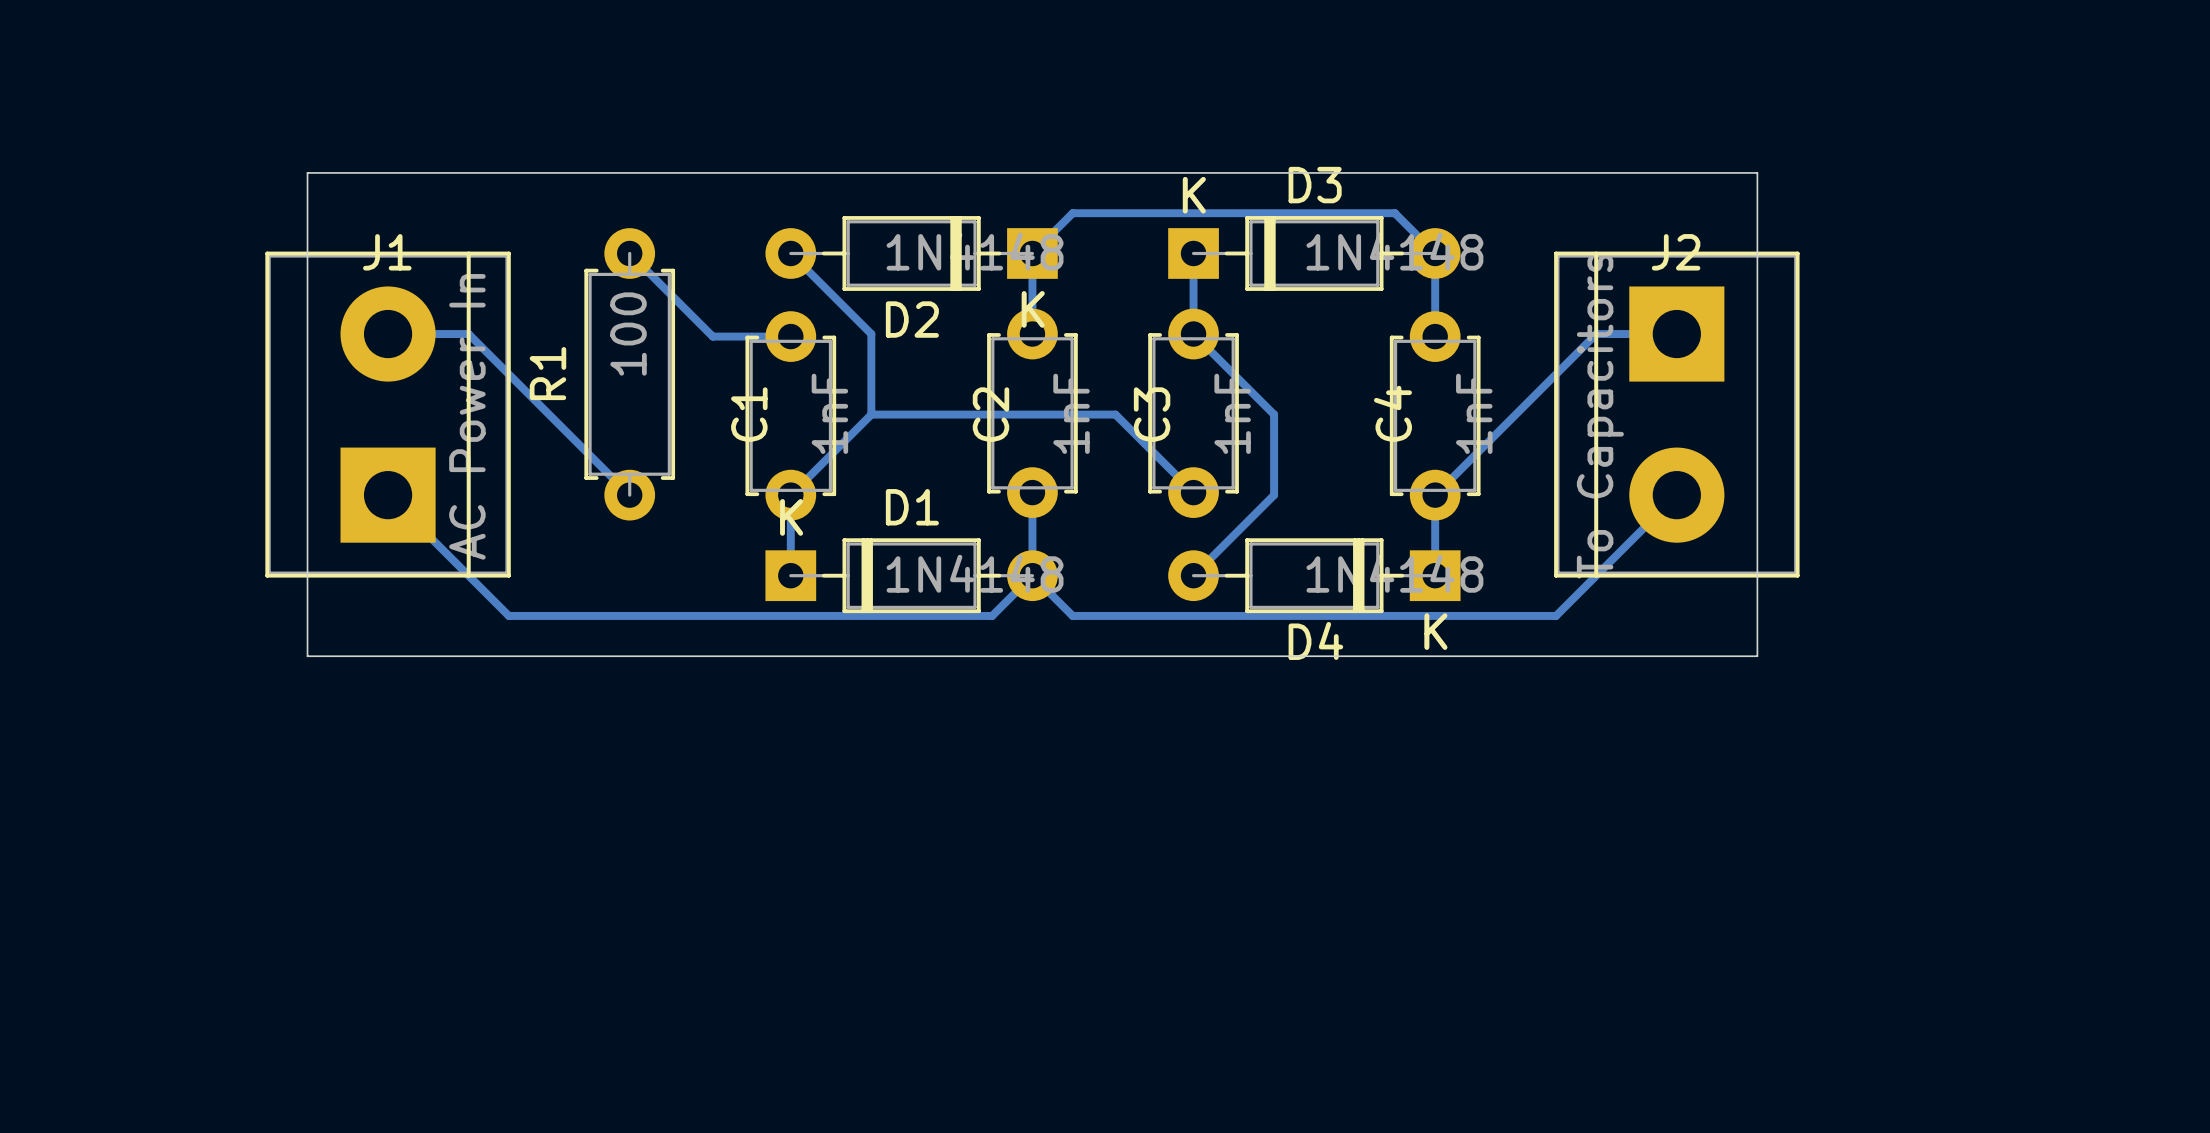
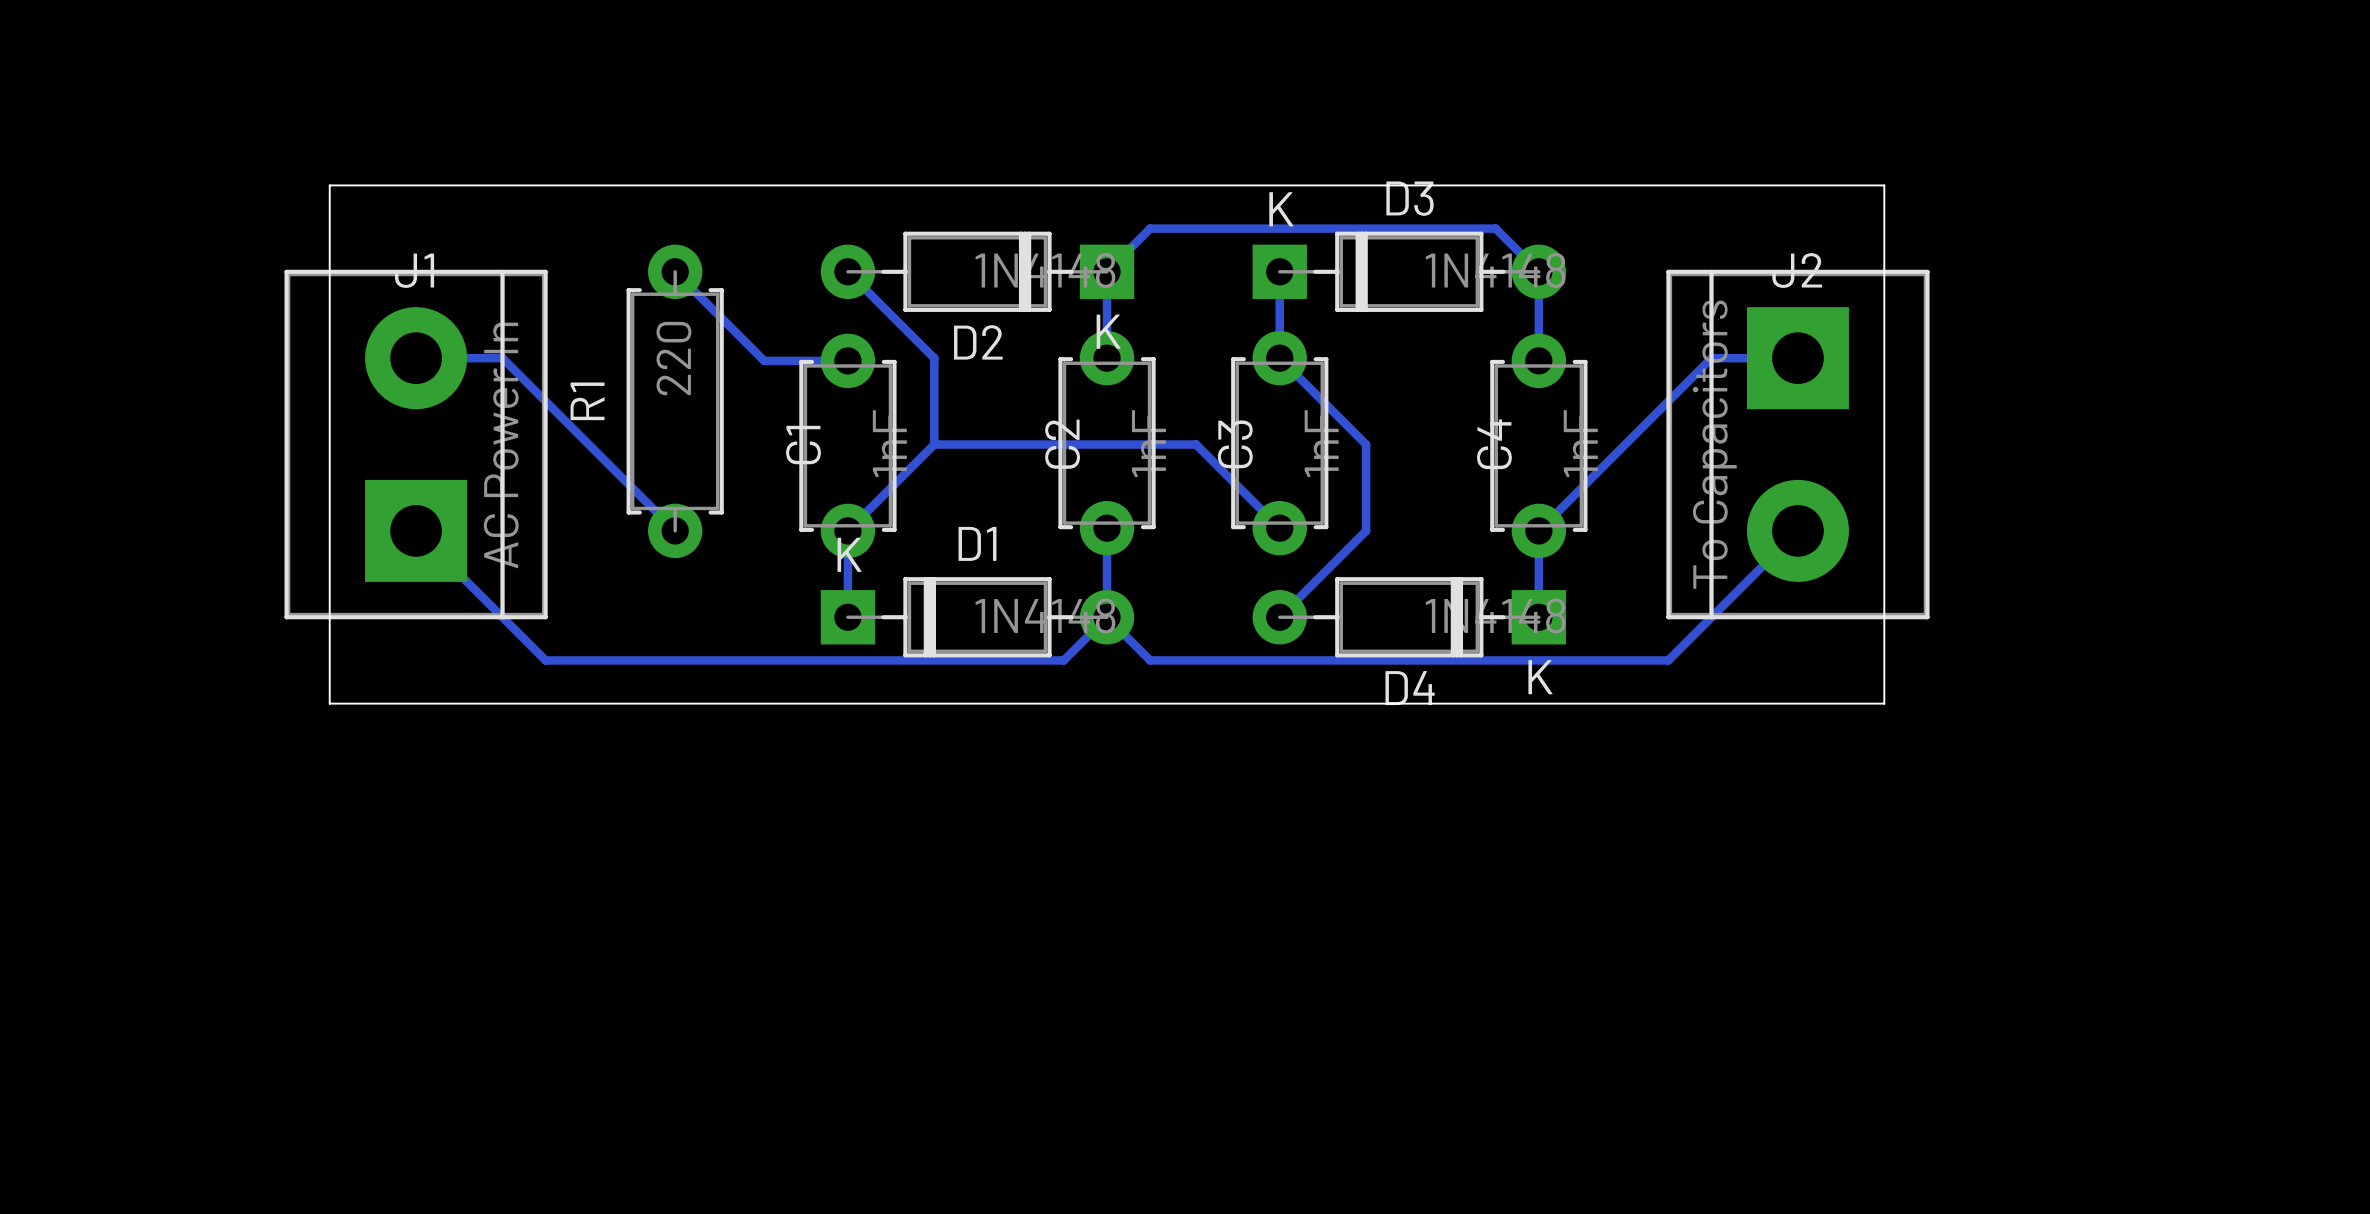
R1 value: 100 (628, 334) -> 220 (673, 358)

